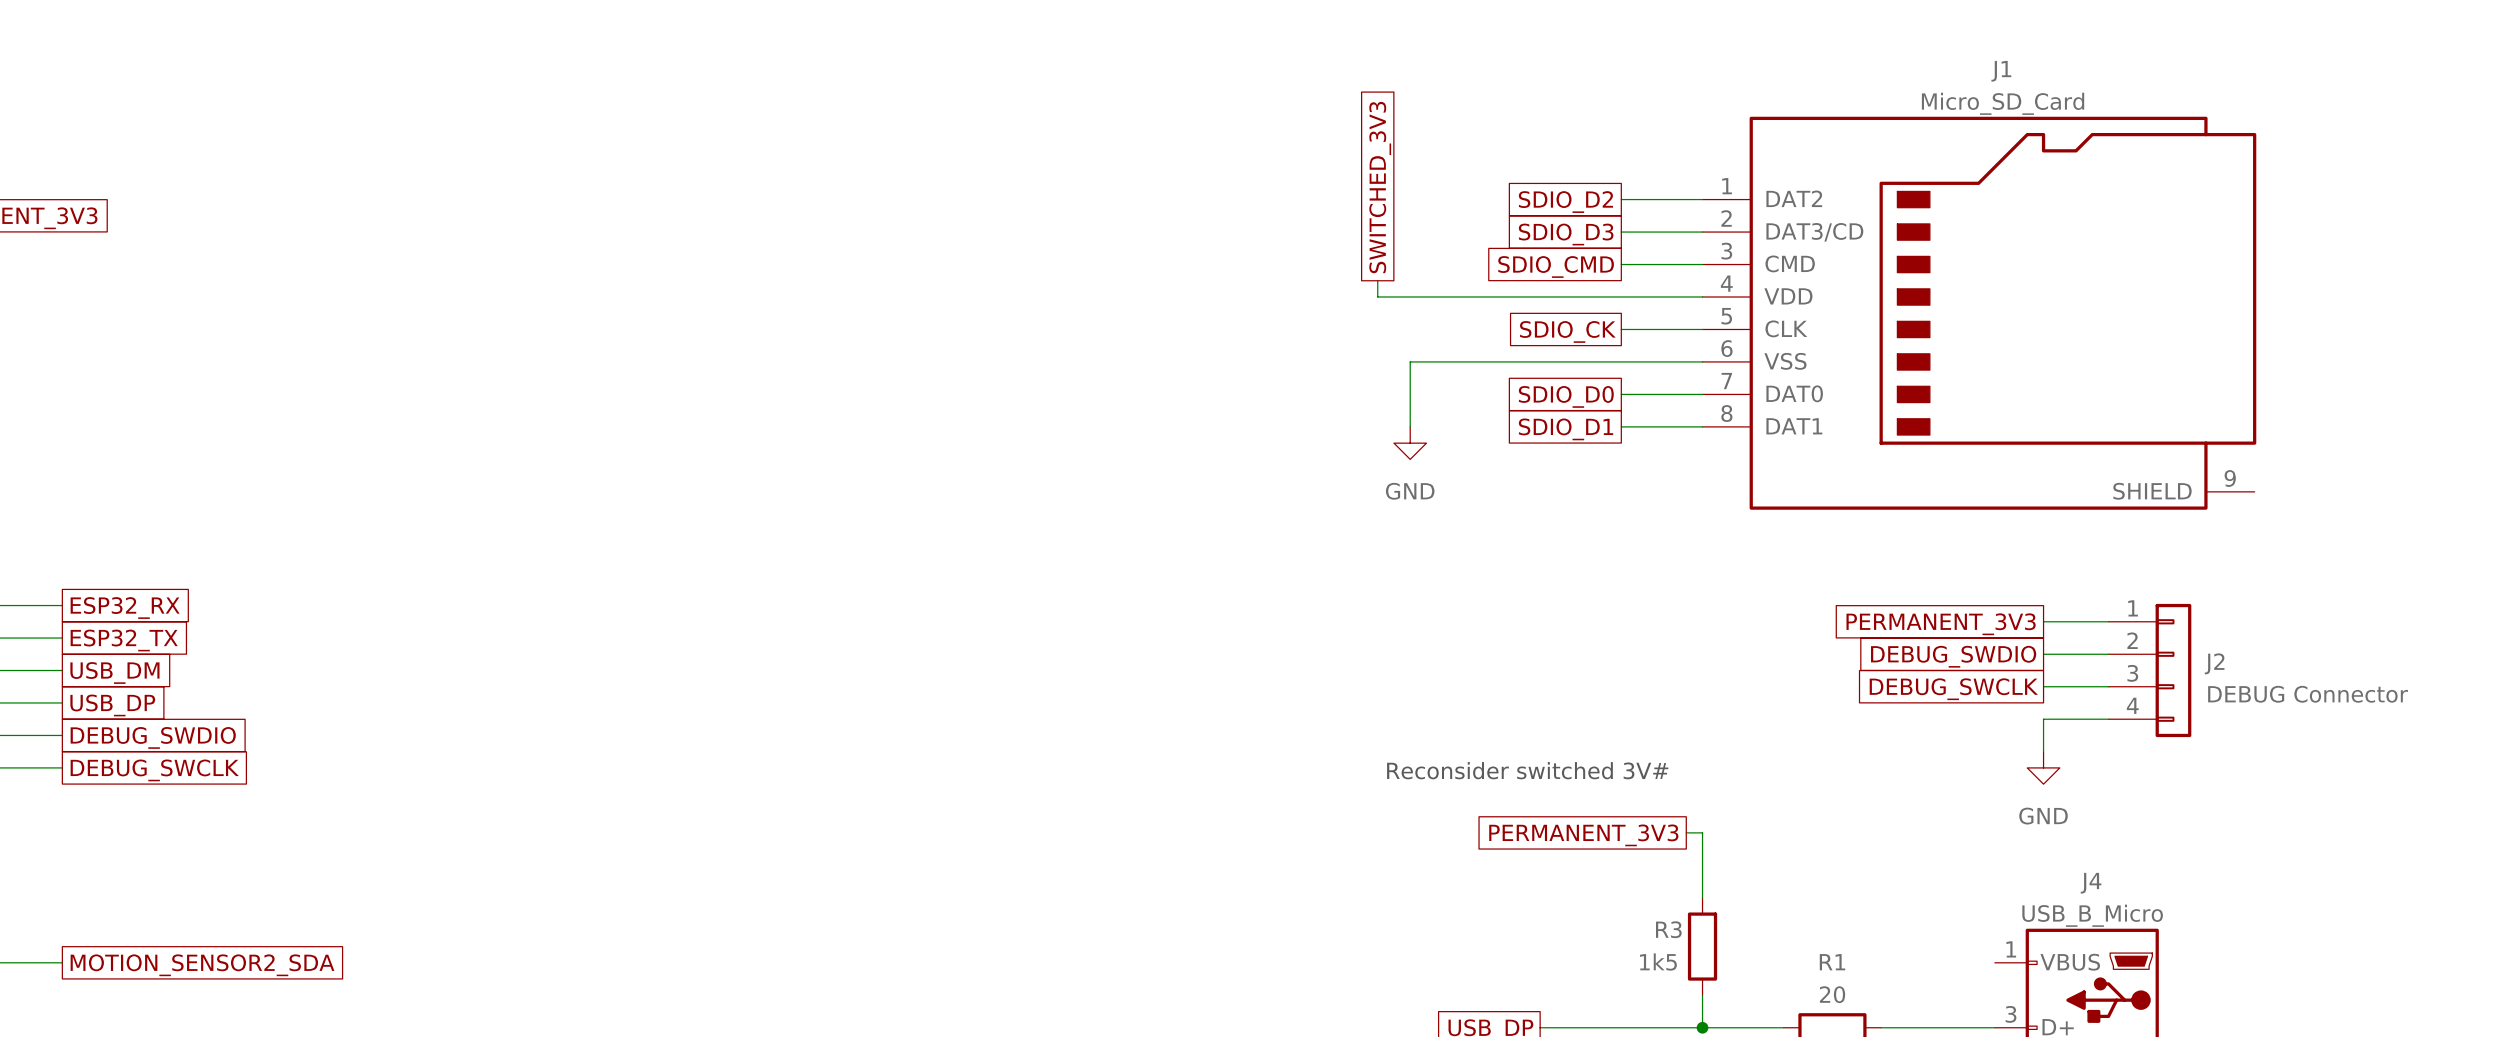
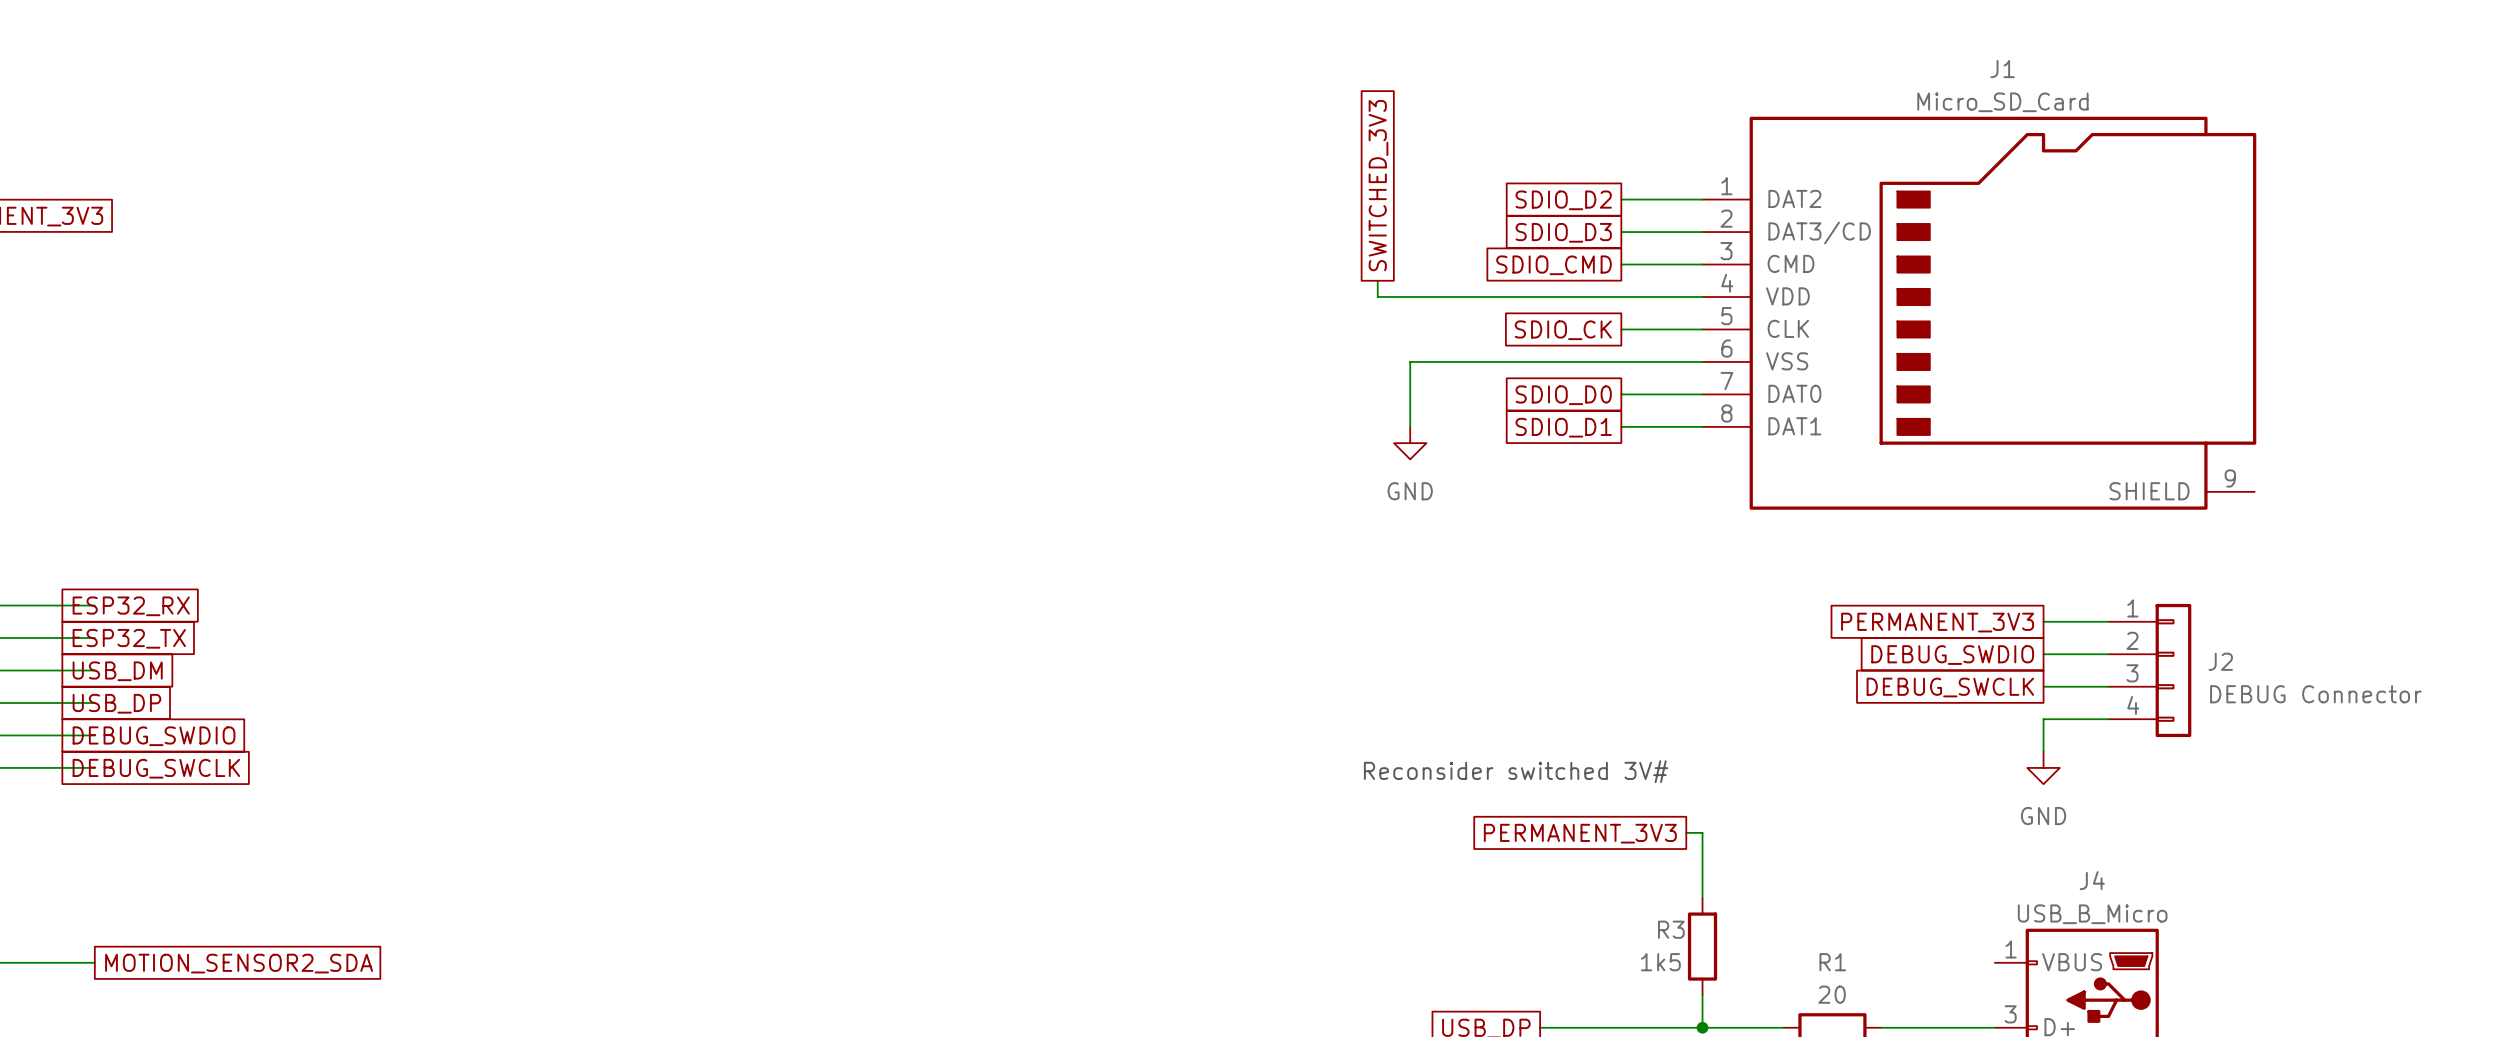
wire: none -> (62, 605) (94, 605)
wire: none -> (62, 638) (94, 638)
wire: none -> (62, 670) (94, 670)
wire: none -> (62, 702) (94, 702)
wire: none -> (62, 735) (94, 735)
wire: none -> (62, 767) (94, 767)
wire: none -> (62, 962) (94, 962)
global label position: MOTION_SENSOR2_SDA (202, 965) -> MOTION_SENSOR2_SDA (239, 963)

